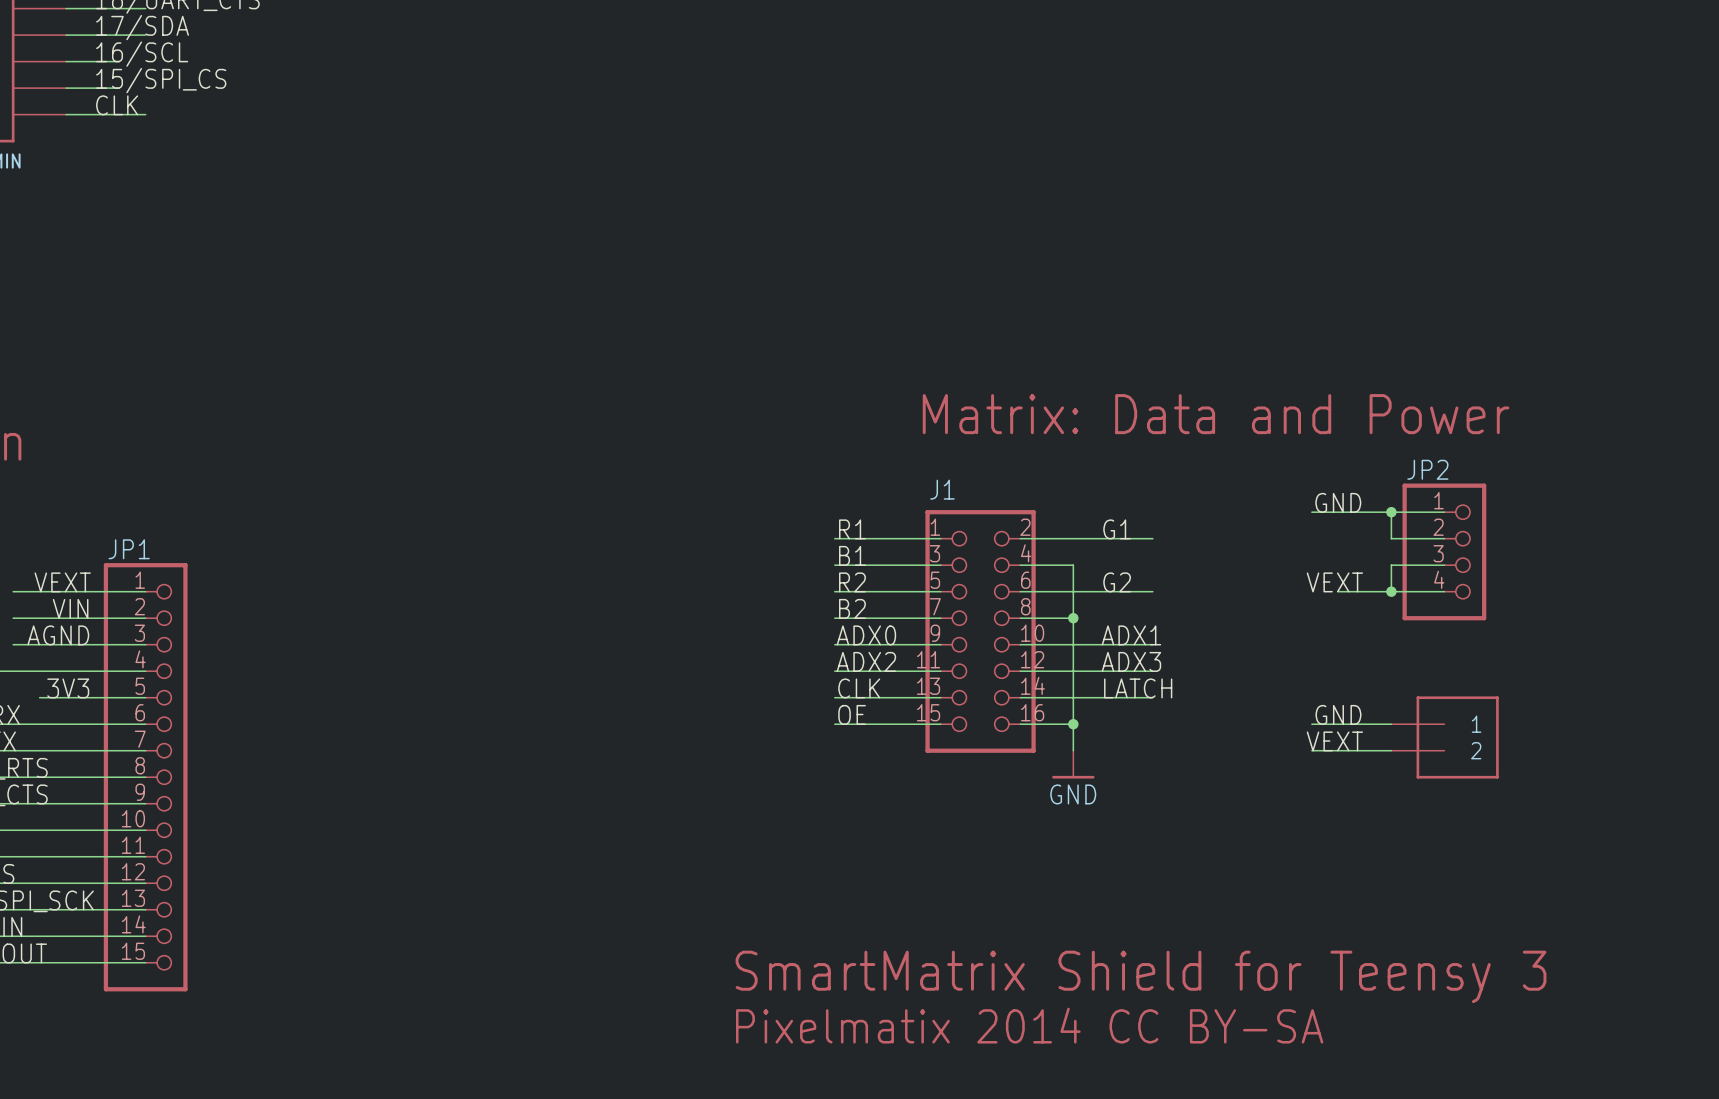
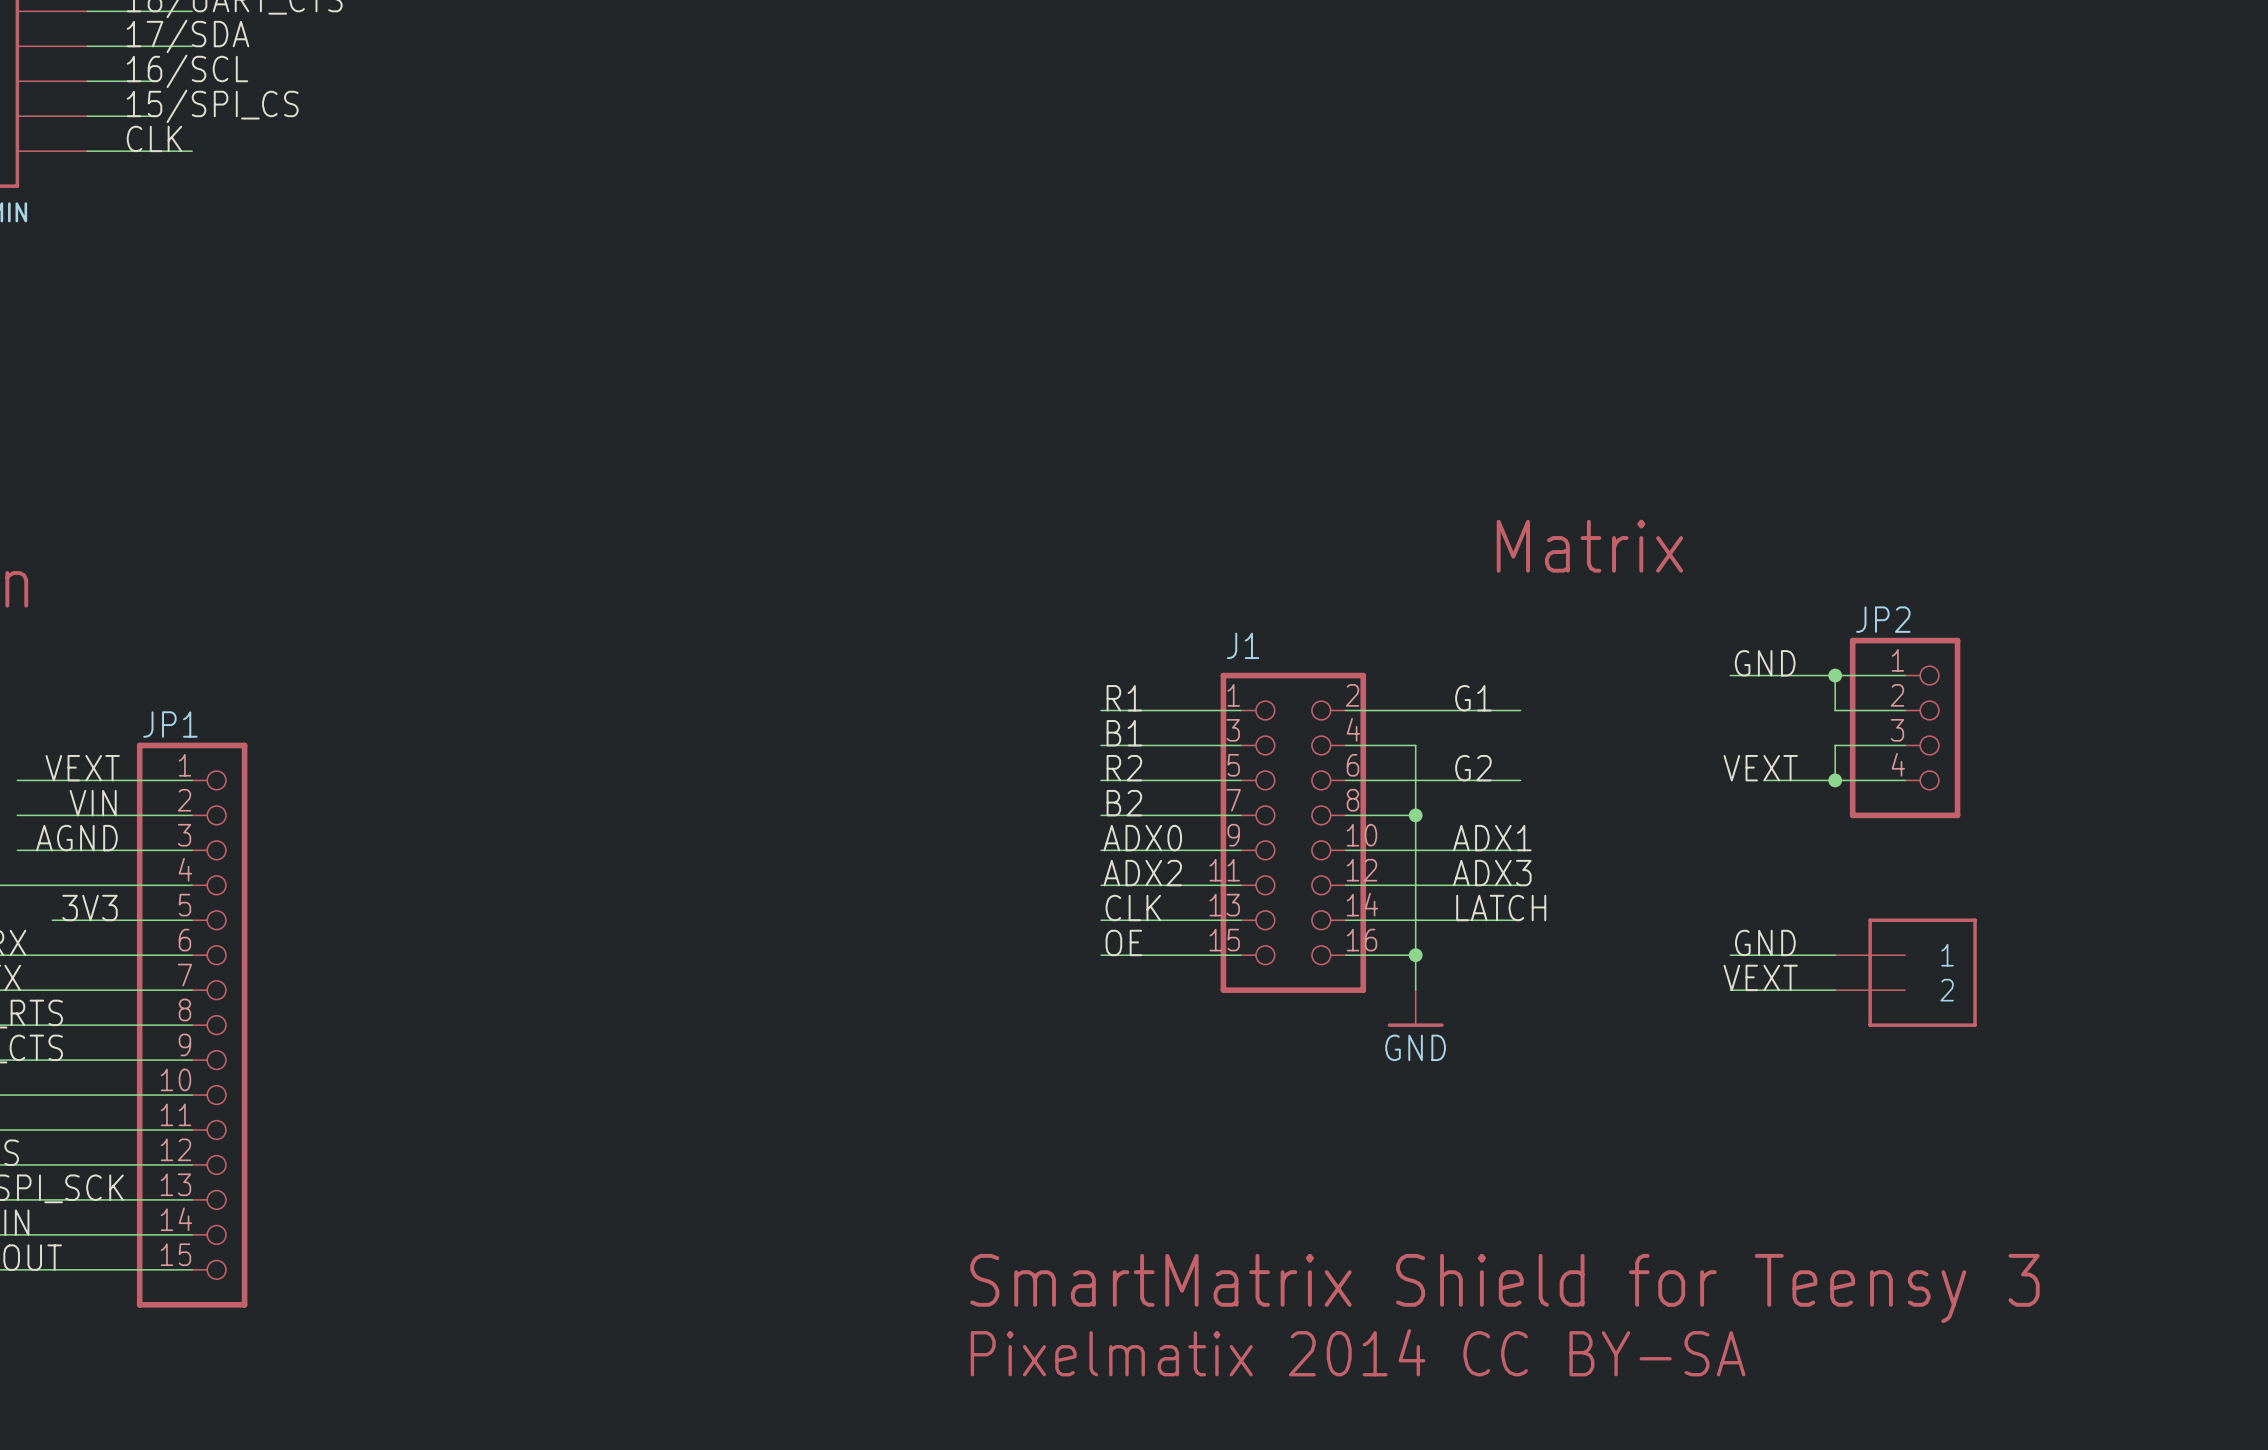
text: none -> Matrix (1589, 546)
text: Matrix: Data and Power (1216, 414) -> none

